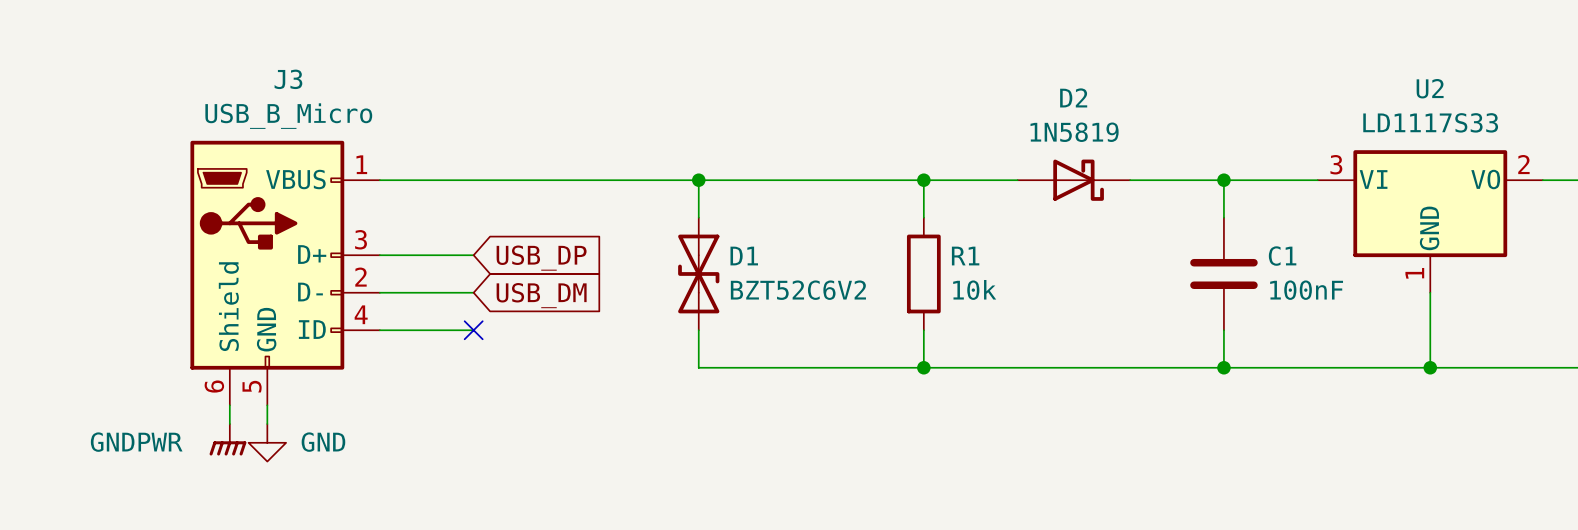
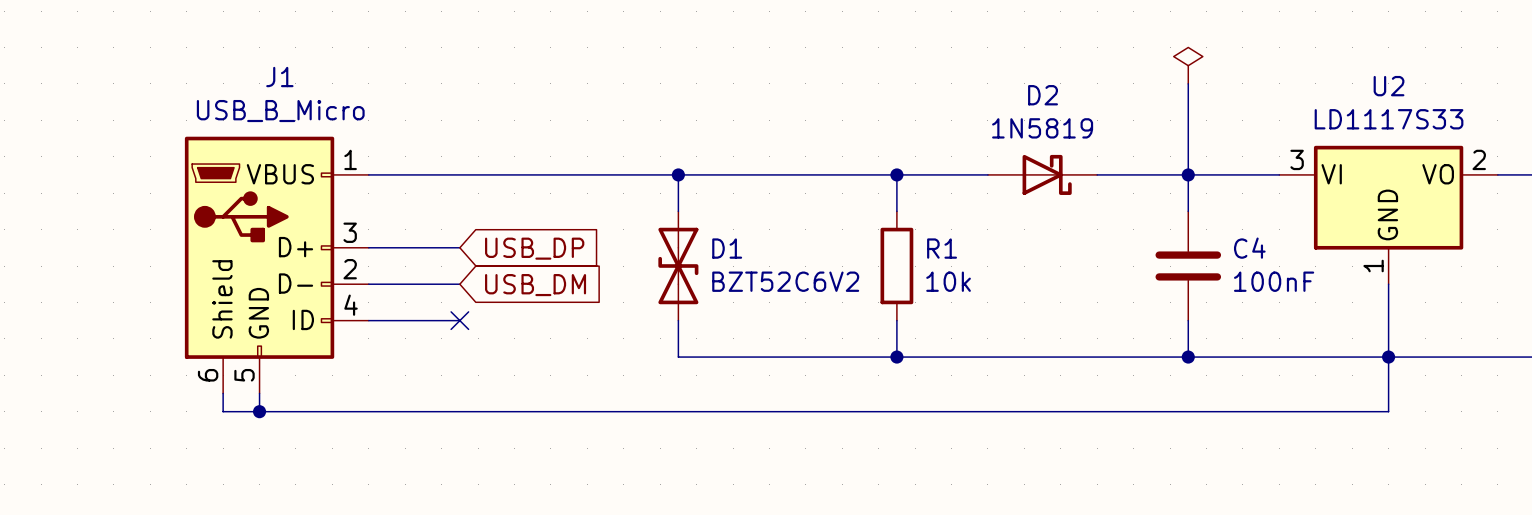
power symbol: none -> (1188, 65)
J3 name: J3 (288, 79) -> J1 (279, 77)
wire: none -> (1188, 83) (1188, 174)
C1 name: C1 (1282, 256) -> C4 (1249, 248)
wire: none -> (1388, 357) (1388, 411) (223, 411)
junction: none -> (259, 411)
power symbol: GNDPWR (227, 439) -> none
power symbol: GND (267, 442) -> none

